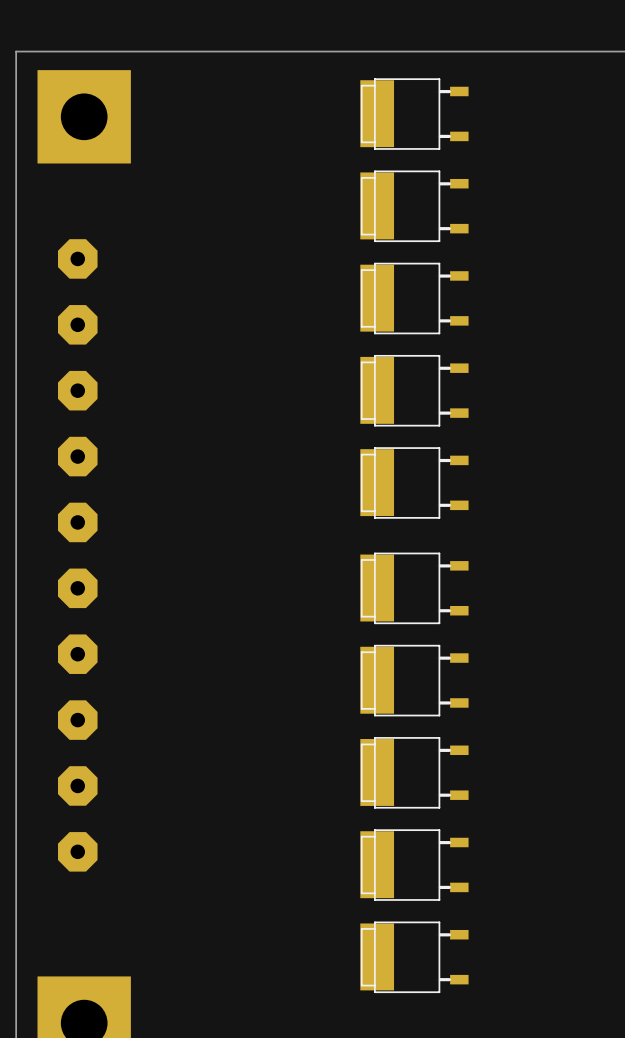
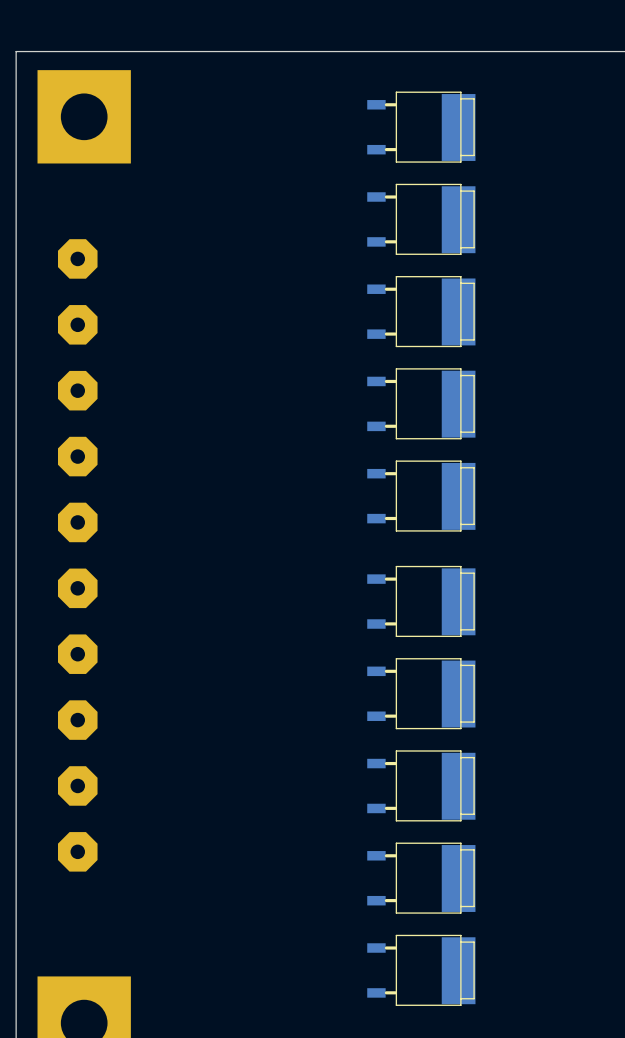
part rotation: 0° (414, 114) -> 180° (421, 127)
part rotation: 0° (414, 206) -> 180° (421, 219)
part rotation: 0° (414, 298) -> 180° (421, 311)
part rotation: 0° (414, 390) -> 180° (421, 403)
part rotation: 0° (414, 482) -> 180° (421, 496)
part rotation: 0° (414, 588) -> 180° (421, 601)
part rotation: 0° (414, 680) -> 180° (421, 693)
part rotation: 0° (414, 772) -> 180° (421, 785)
part rotation: 0° (414, 865) -> 180° (421, 878)
part rotation: 0° (414, 957) -> 180° (421, 970)

